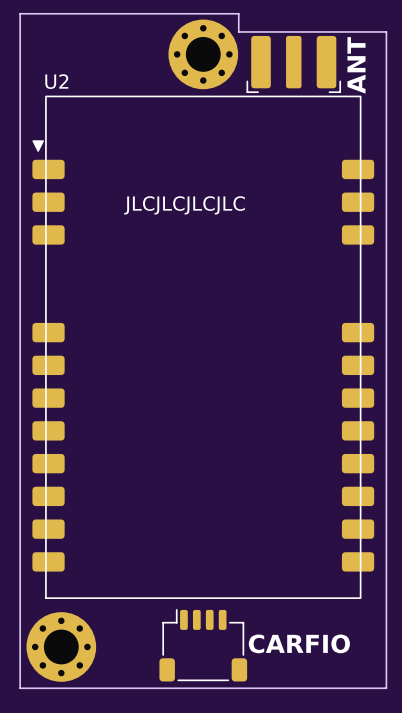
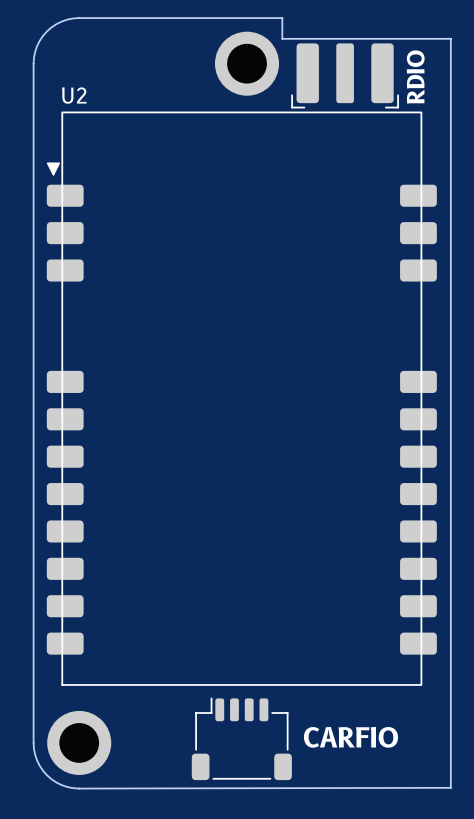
board edge: (60, 13) (20, 13) (20, 688) (386, 688) -> (79, 18) (61, 21) (46, 31) (37, 46) (33, 63) (33, 742) (37, 760) (43, 770) (51, 779) (61, 785) (73, 788) (450, 787)
part footprint: [168, 19, 239, 90] -> [215, 31, 280, 96]
text: ANT (356, 65) -> RDIO (415, 77)
text: JLCJLCJLCJLC (184, 205) -> none
part footprint: [26, 612, 97, 682] -> [47, 710, 112, 775]

